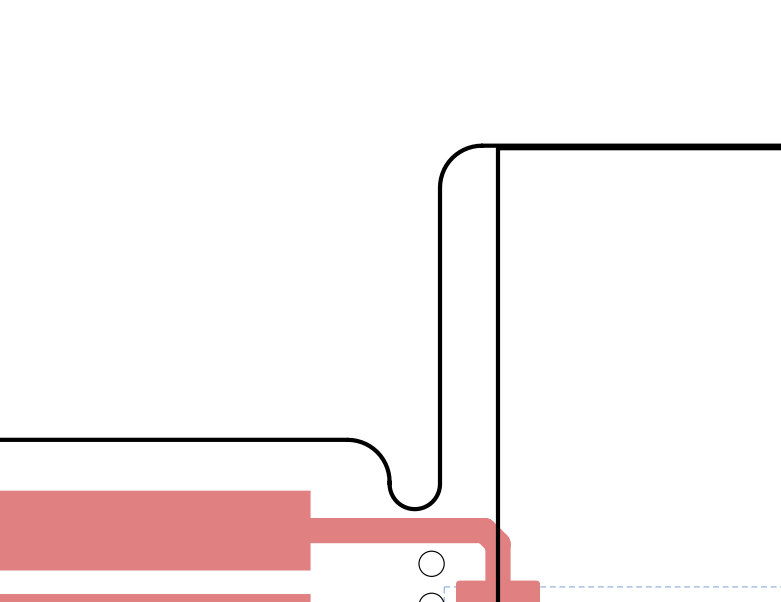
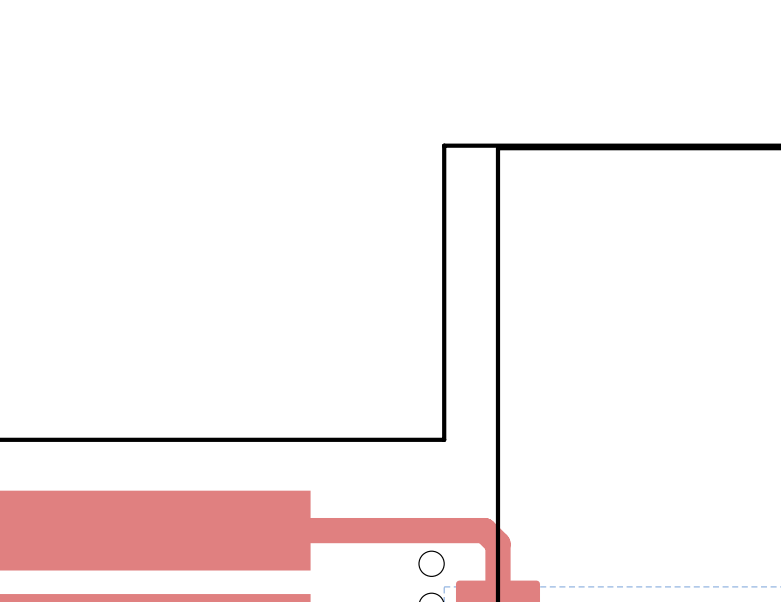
board edge: (482, 145) (463, 149) (452, 157) (444, 169) (440, 183) (440, 483) (436, 496) (430, 503) (421, 508) (411, 508) (402, 505) (391, 493) (387, 467) (380, 455) (365, 443) (347, 439) -> (482, 145) (444, 145) (444, 439) (347, 439)

